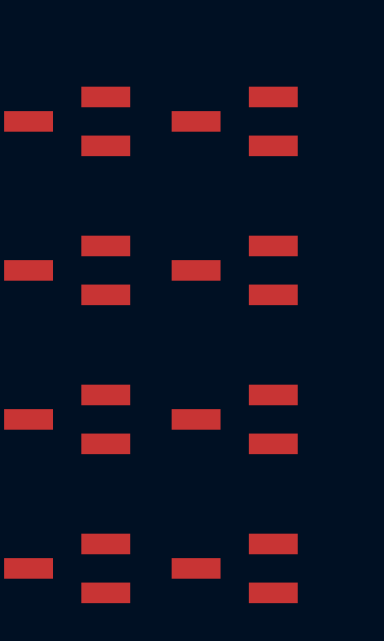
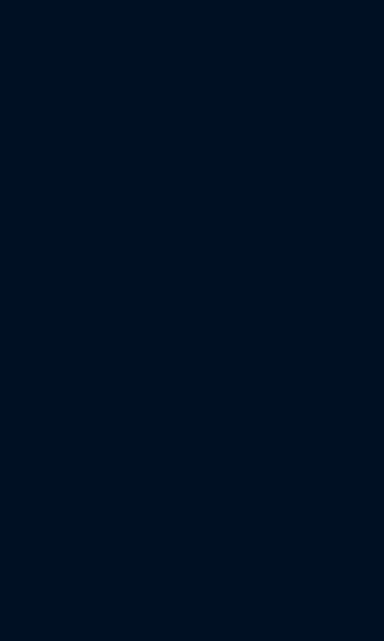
part: (67, 121) -> none
part: (234, 121) -> none
part: (67, 270) -> none
part: (234, 270) -> none
part: (67, 419) -> none
part: (234, 419) -> none
part: (67, 568) -> none
part: (234, 568) -> none

